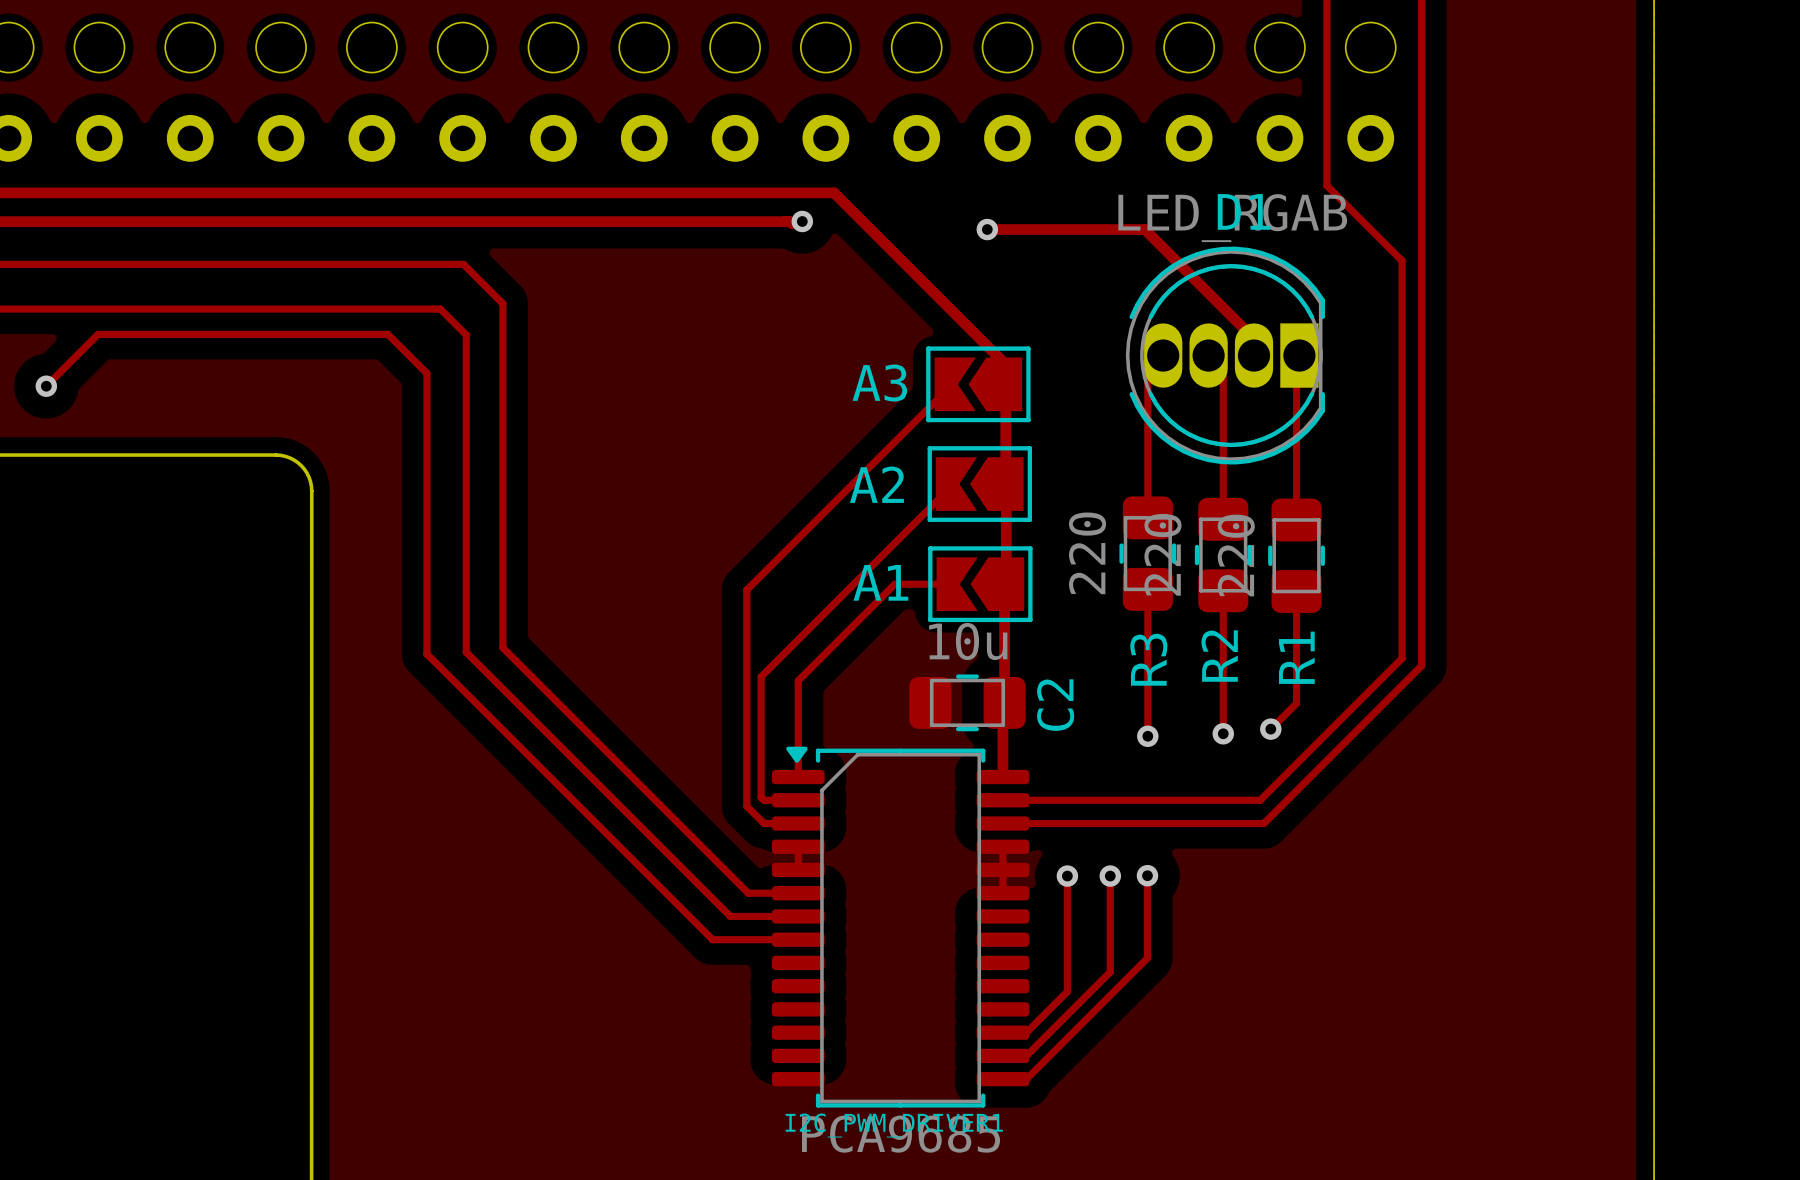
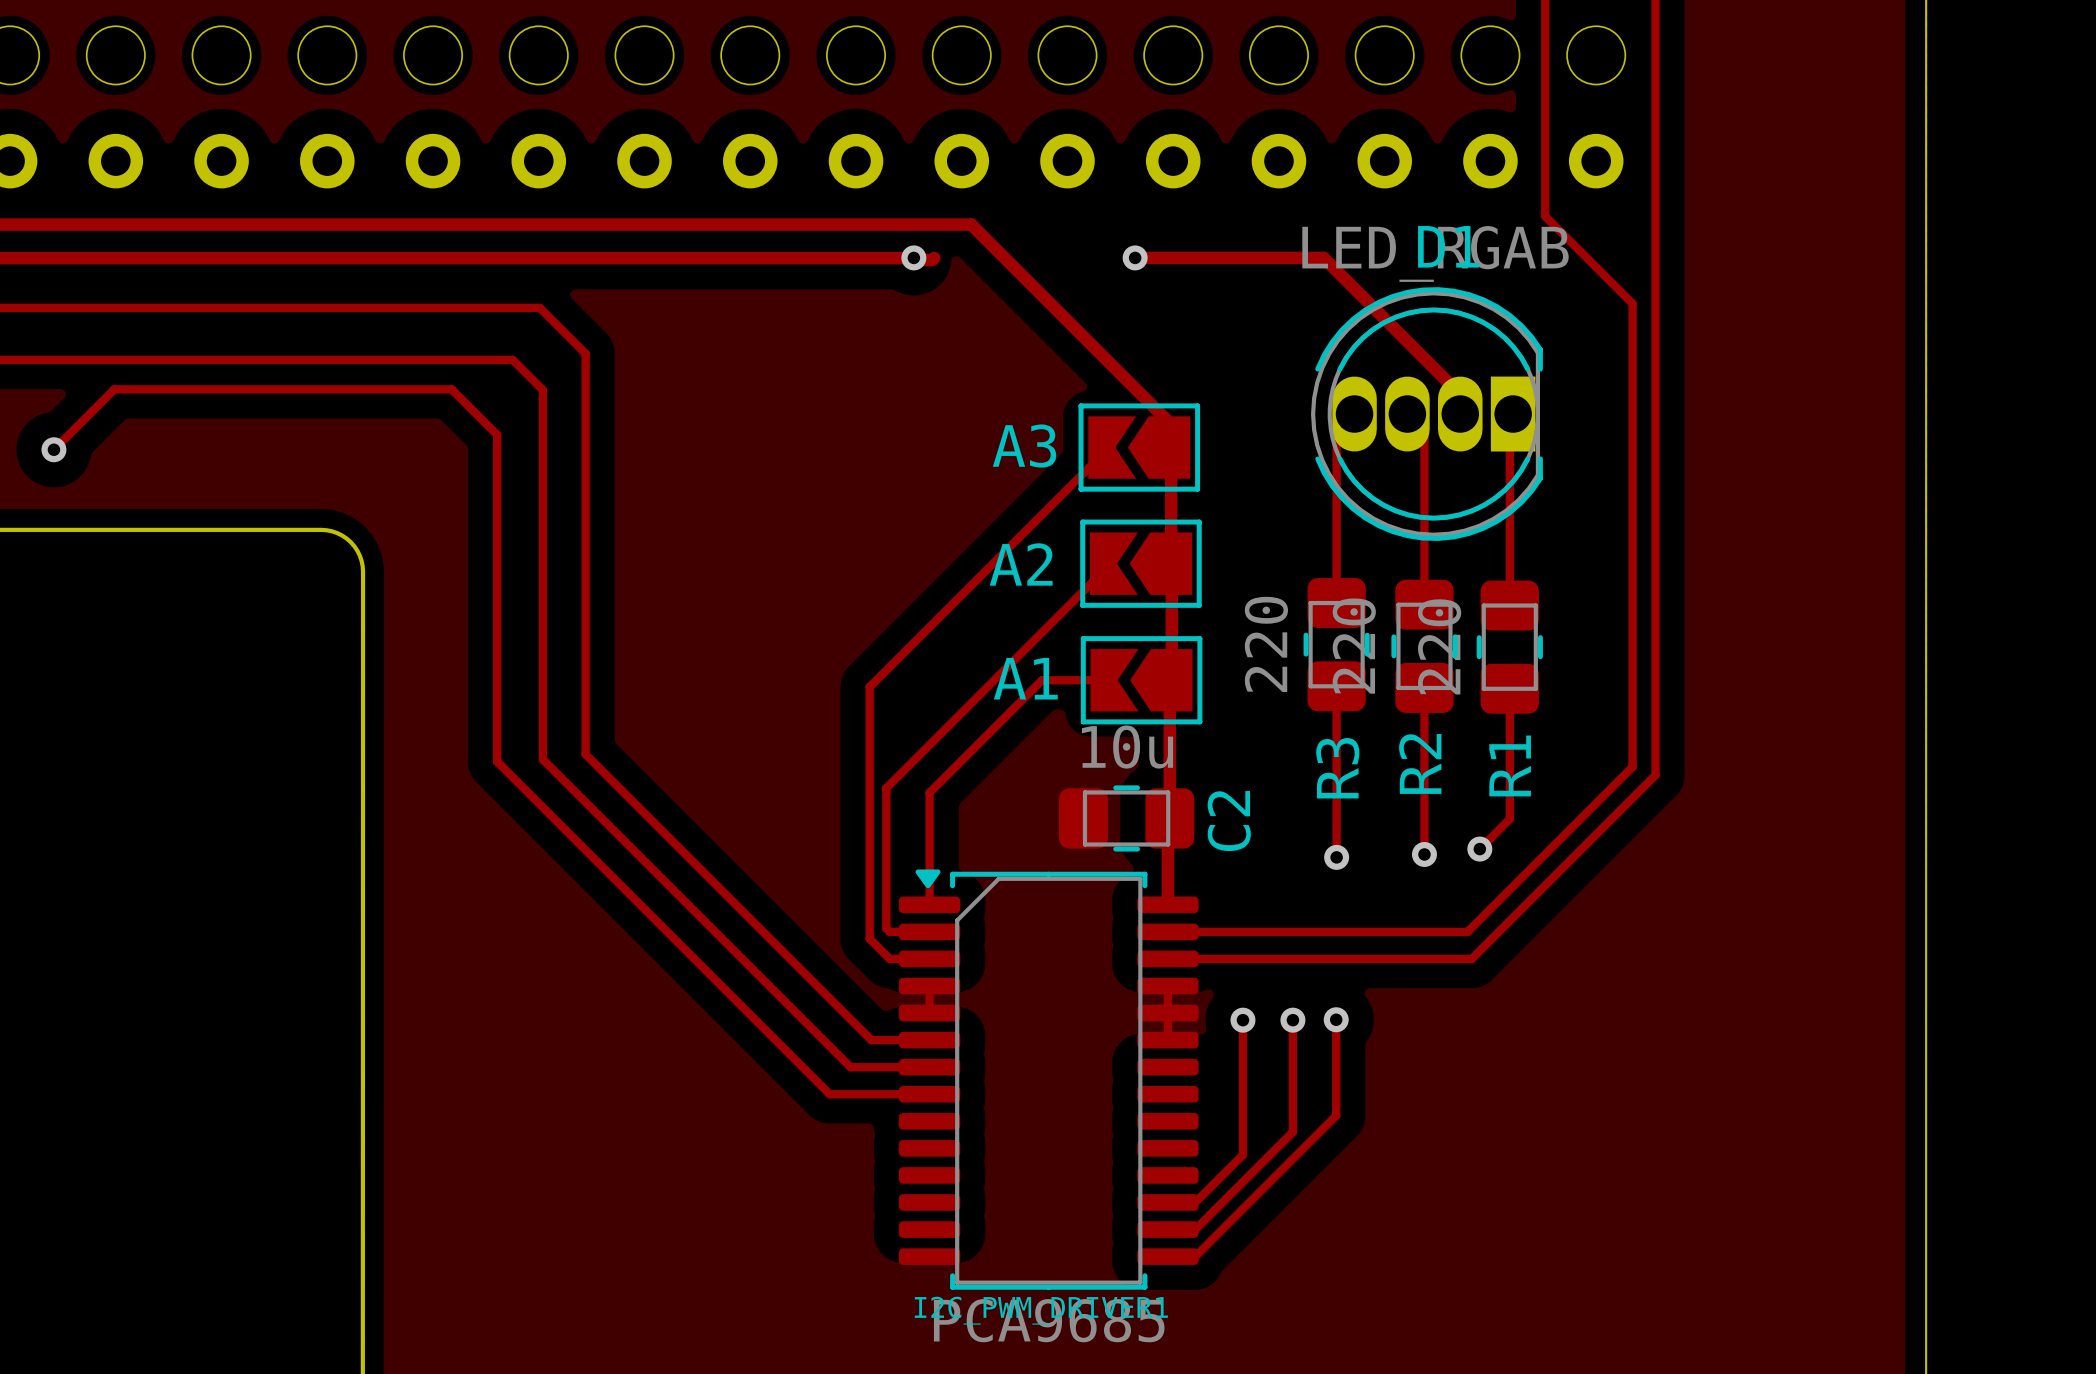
via position: (802, 221) -> (913, 257)
track: (987, 229) (1144, 229) -> (1135, 257) (1323, 257) (1333, 267)
via position: (987, 229) -> (1135, 257)

